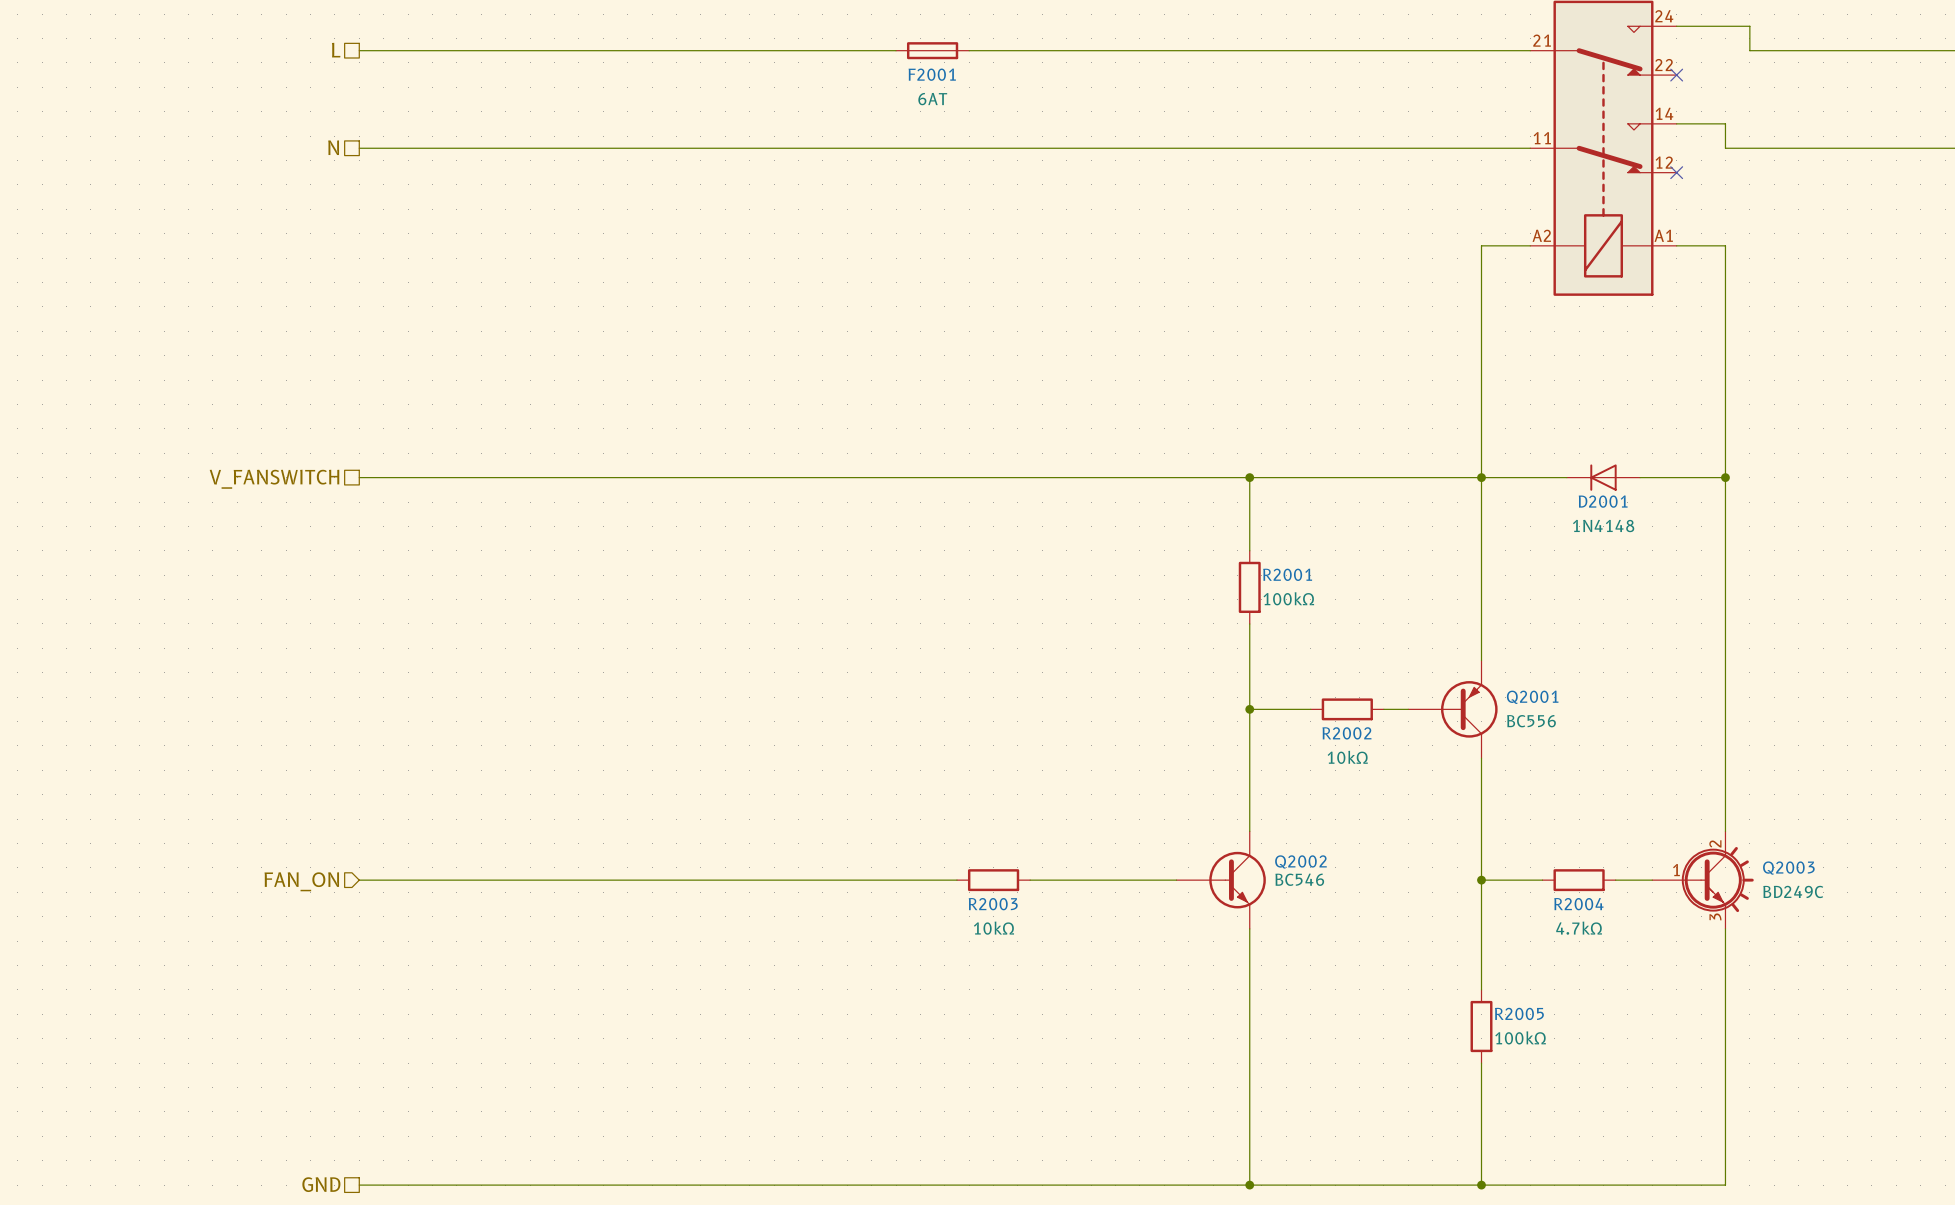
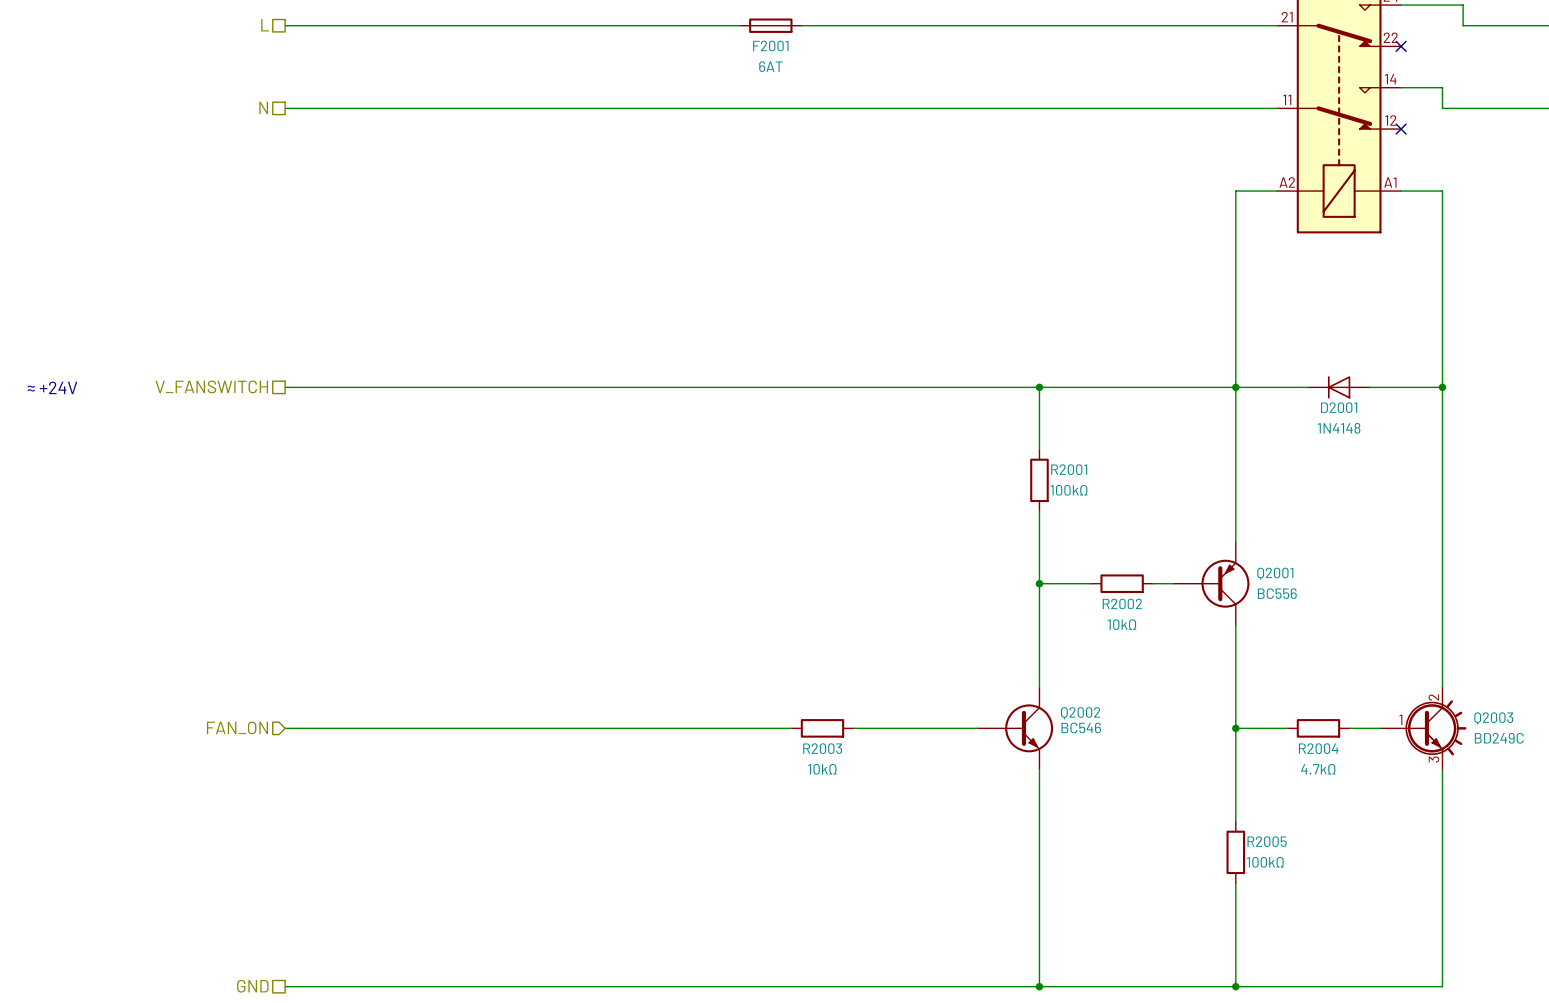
text: none -> ≈ +24V (52, 387)

